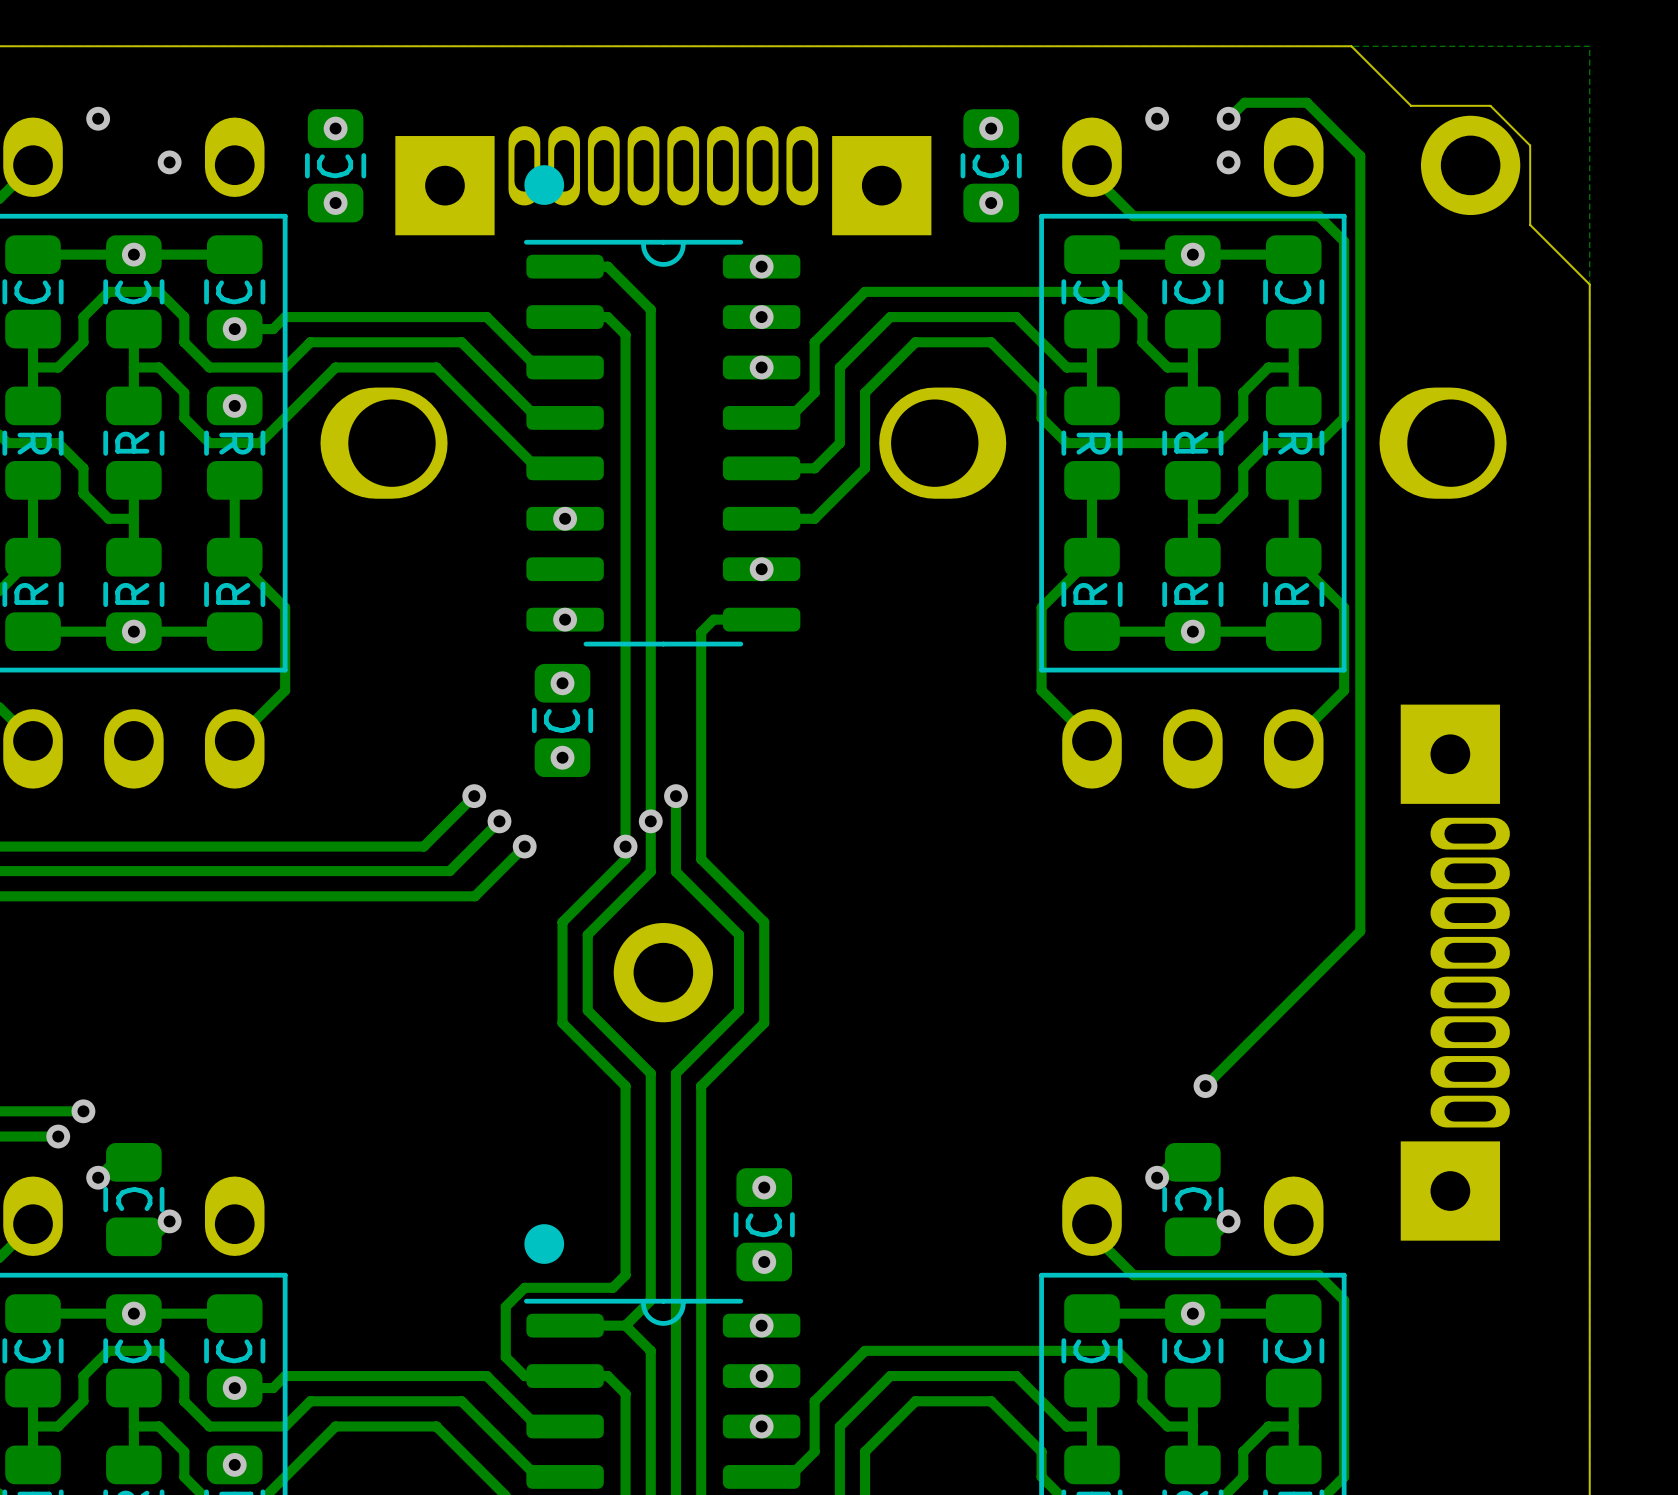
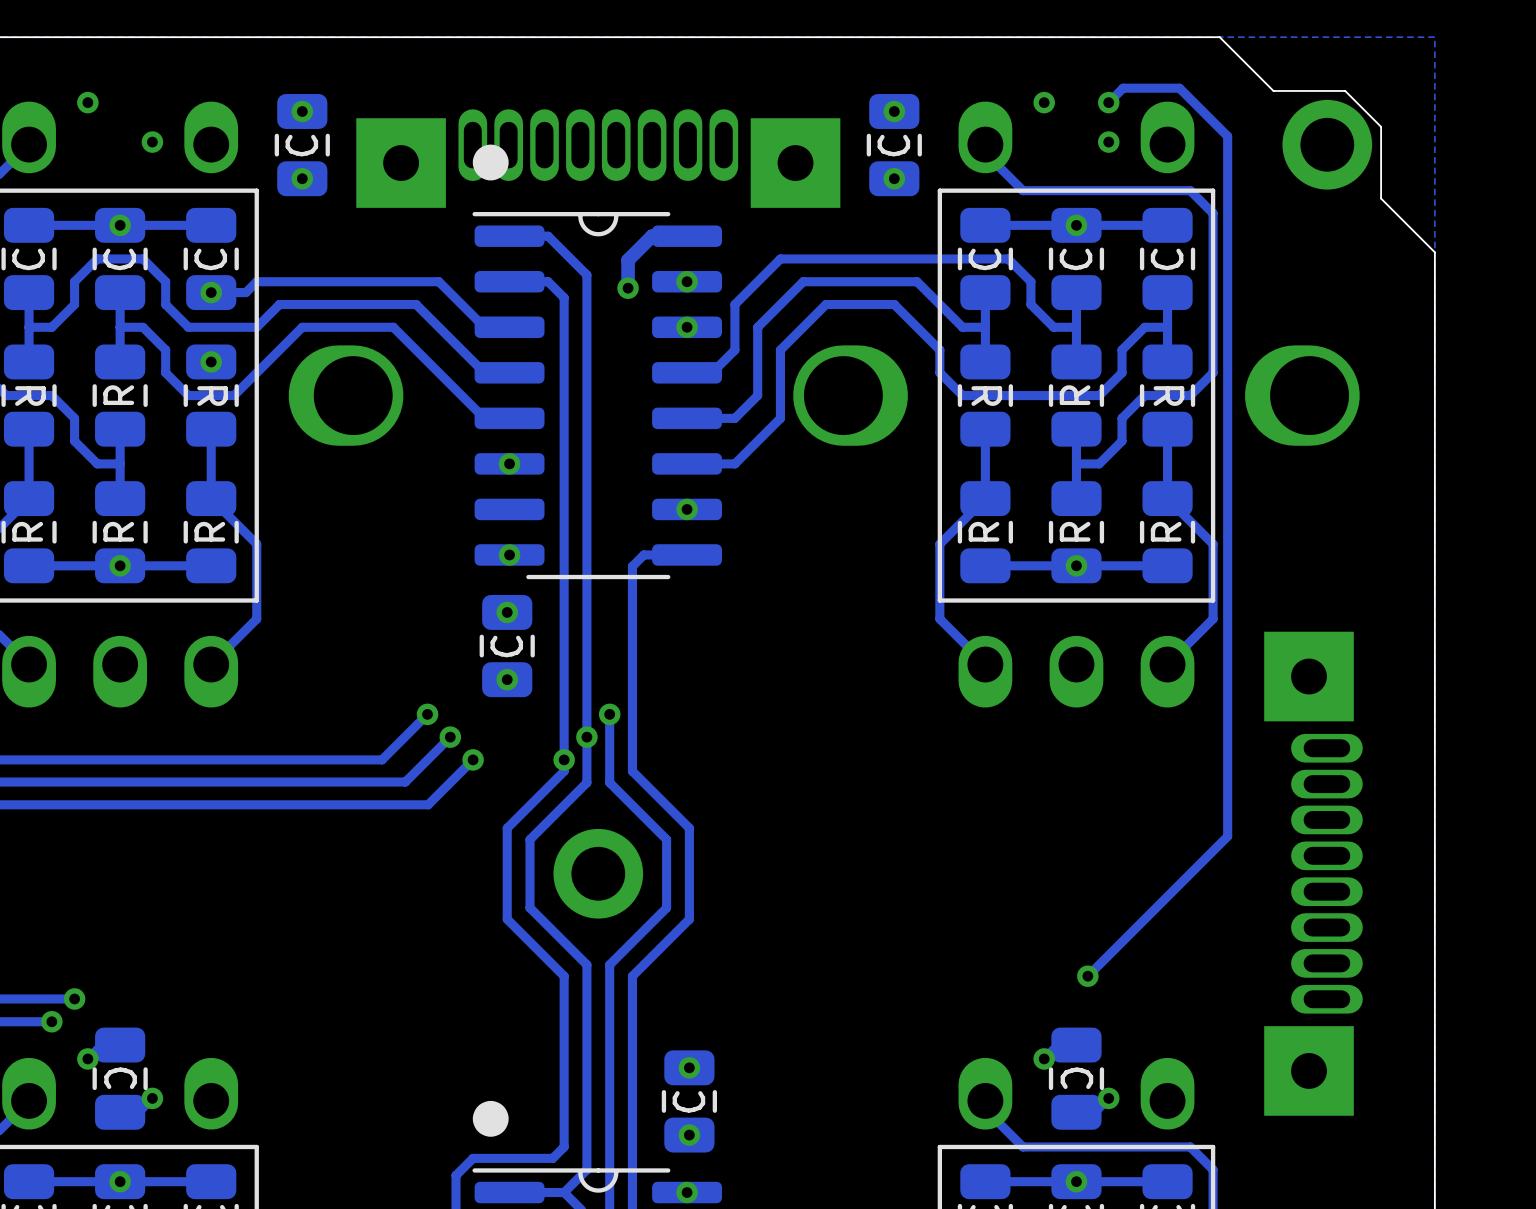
track: none -> (687, 236) (652, 236) (628, 260) (628, 288)
via position: (761, 266) -> (628, 288)

